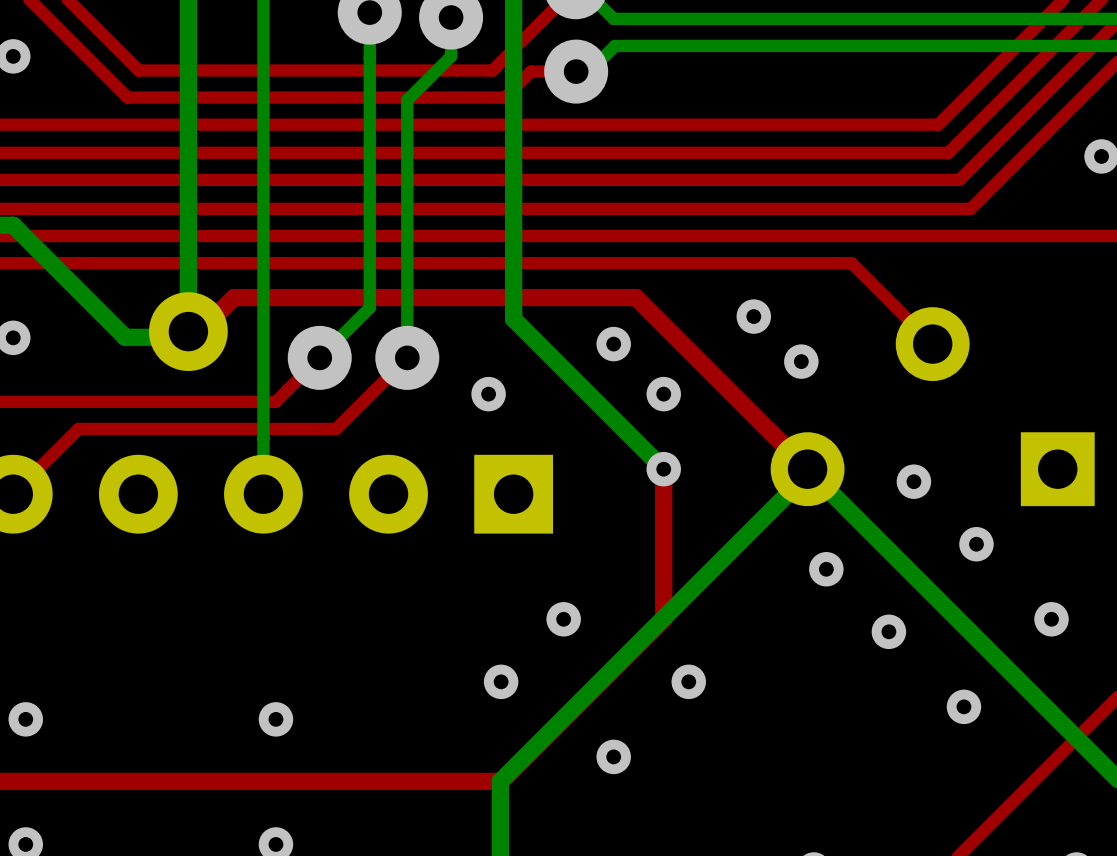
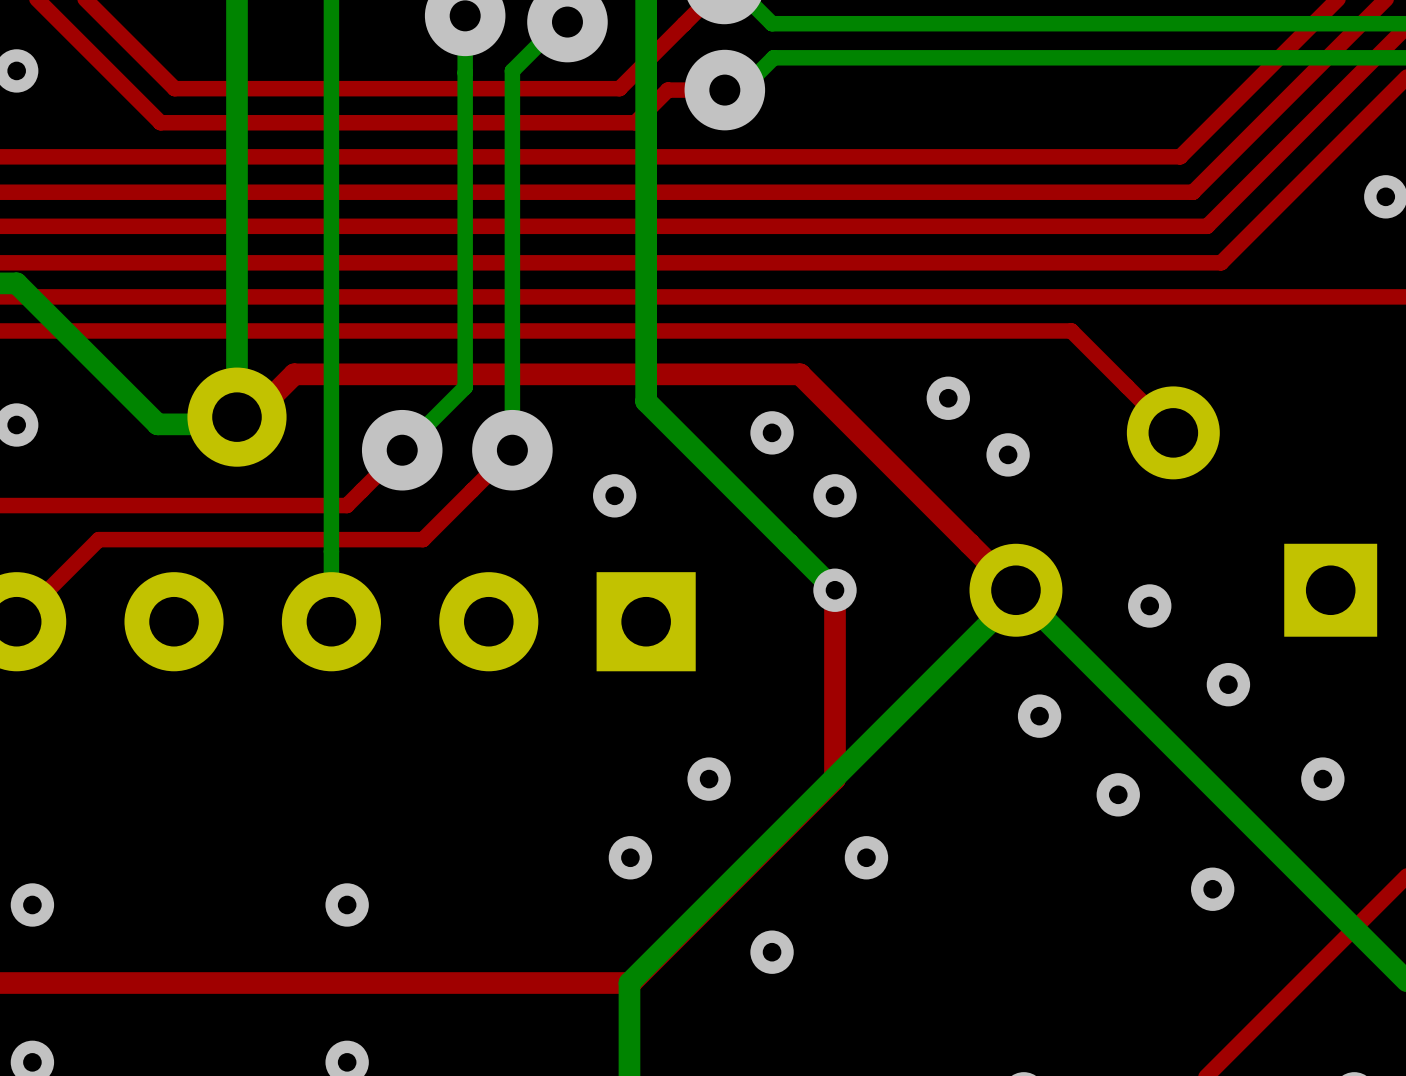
bottom track: (451, 17) (451, 56) (407, 100) -> (567, 22) (561, 22) (512, 70) (512, 126)

